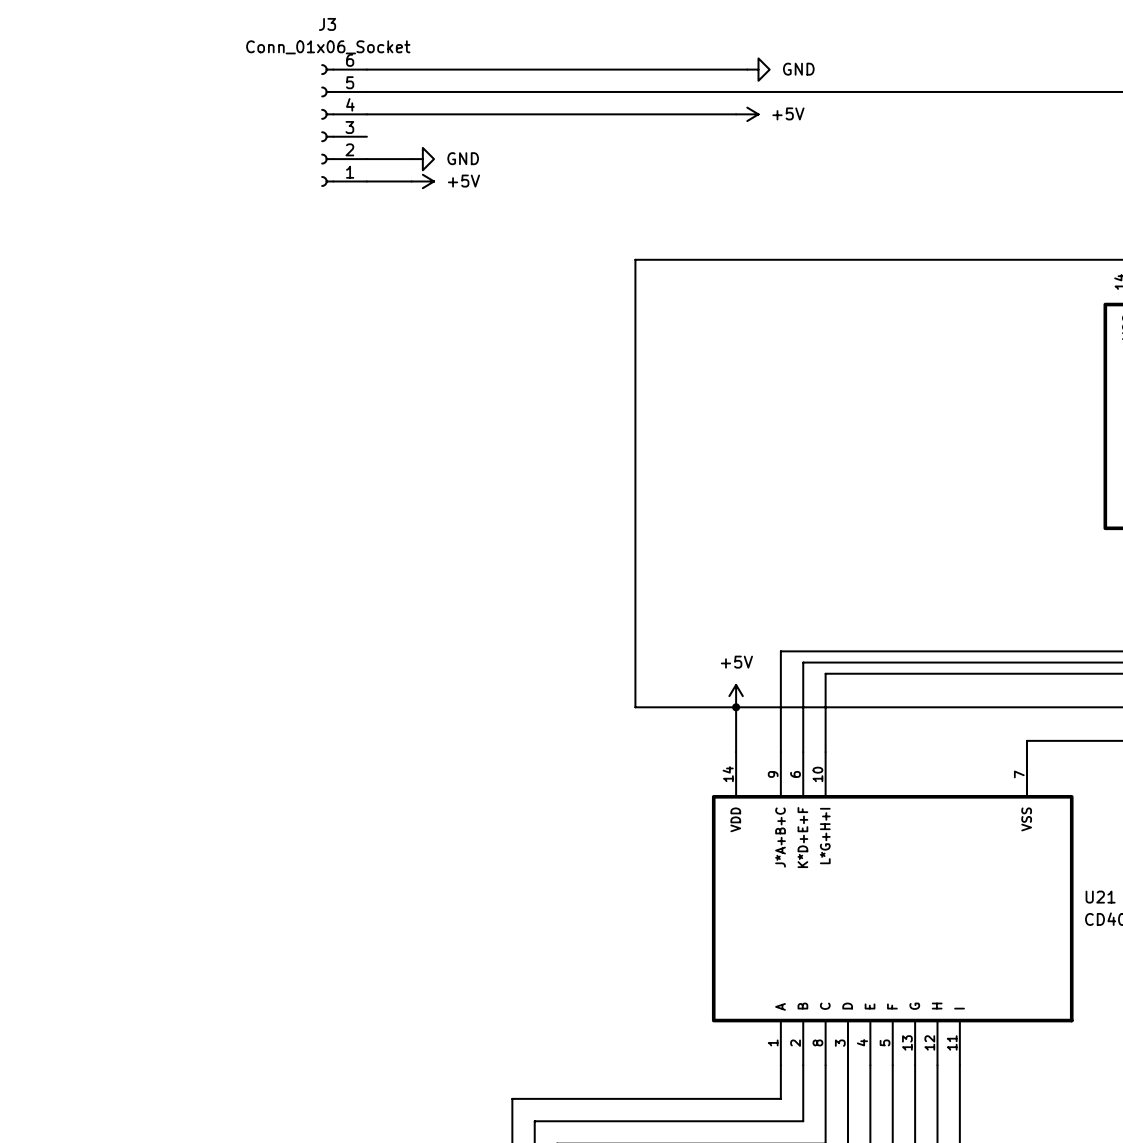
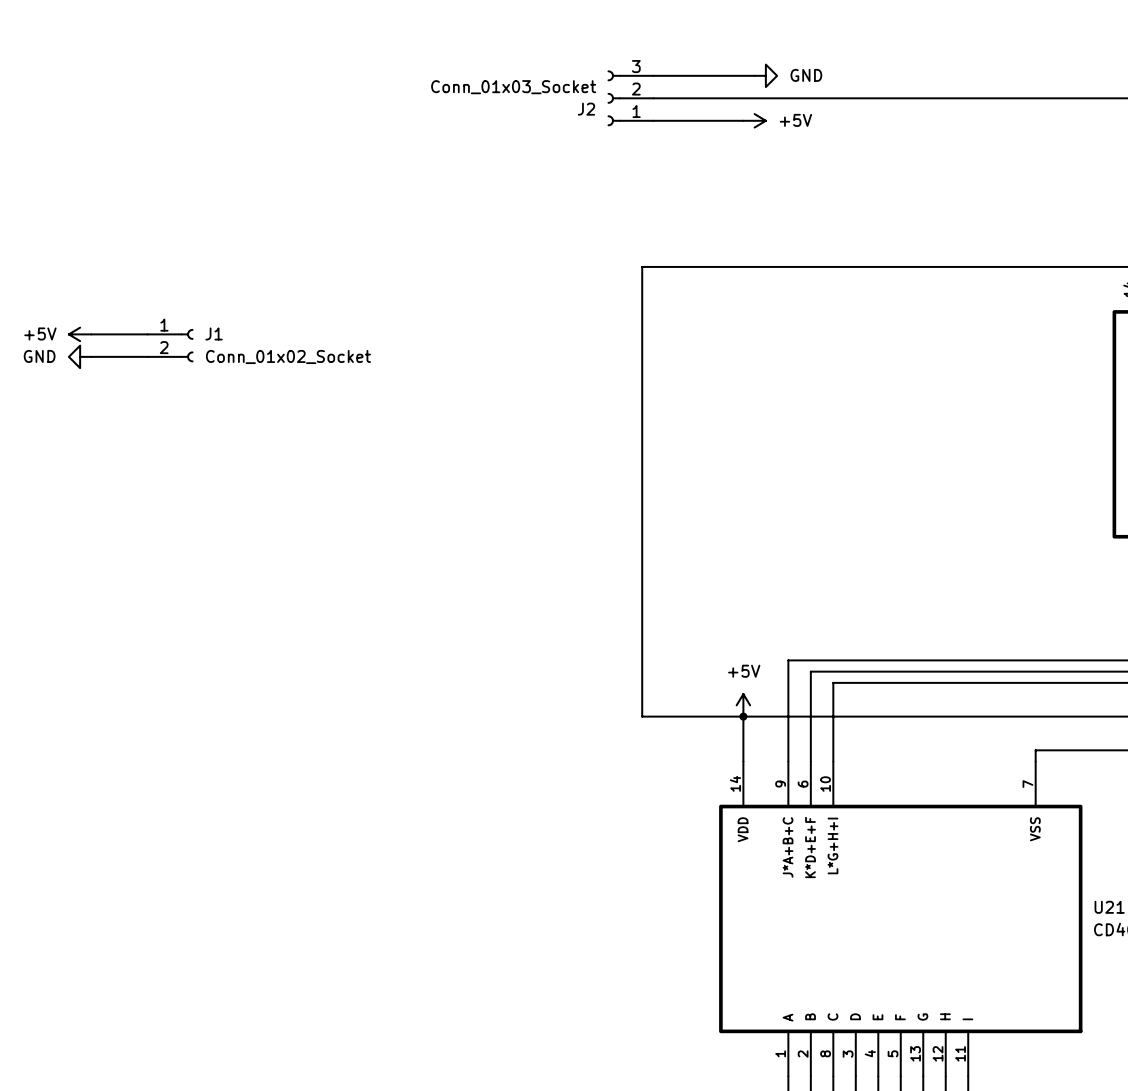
wire: (366, 69) (646, 69) -> none
wire: (366, 91) (646, 91) -> none
J2: none -> Conn_01x03_Socket (630, 98)
wire: (366, 114) (646, 114) -> none
J3: Conn_01x06_Socket (344, 125) -> none
wire: (366, 159) (411, 159) -> none
power symbol: GND (422, 159) -> none
wire: (366, 181) (411, 181) -> none
power symbol: +5V (422, 181) -> none
power symbol: none -> +5V (80, 334)
wire: none -> (91, 334) (147, 334)
J1: none -> Conn_01x02_Socket (170, 345)
power symbol: none -> GND (80, 356)
wire: none -> (91, 356) (147, 356)

